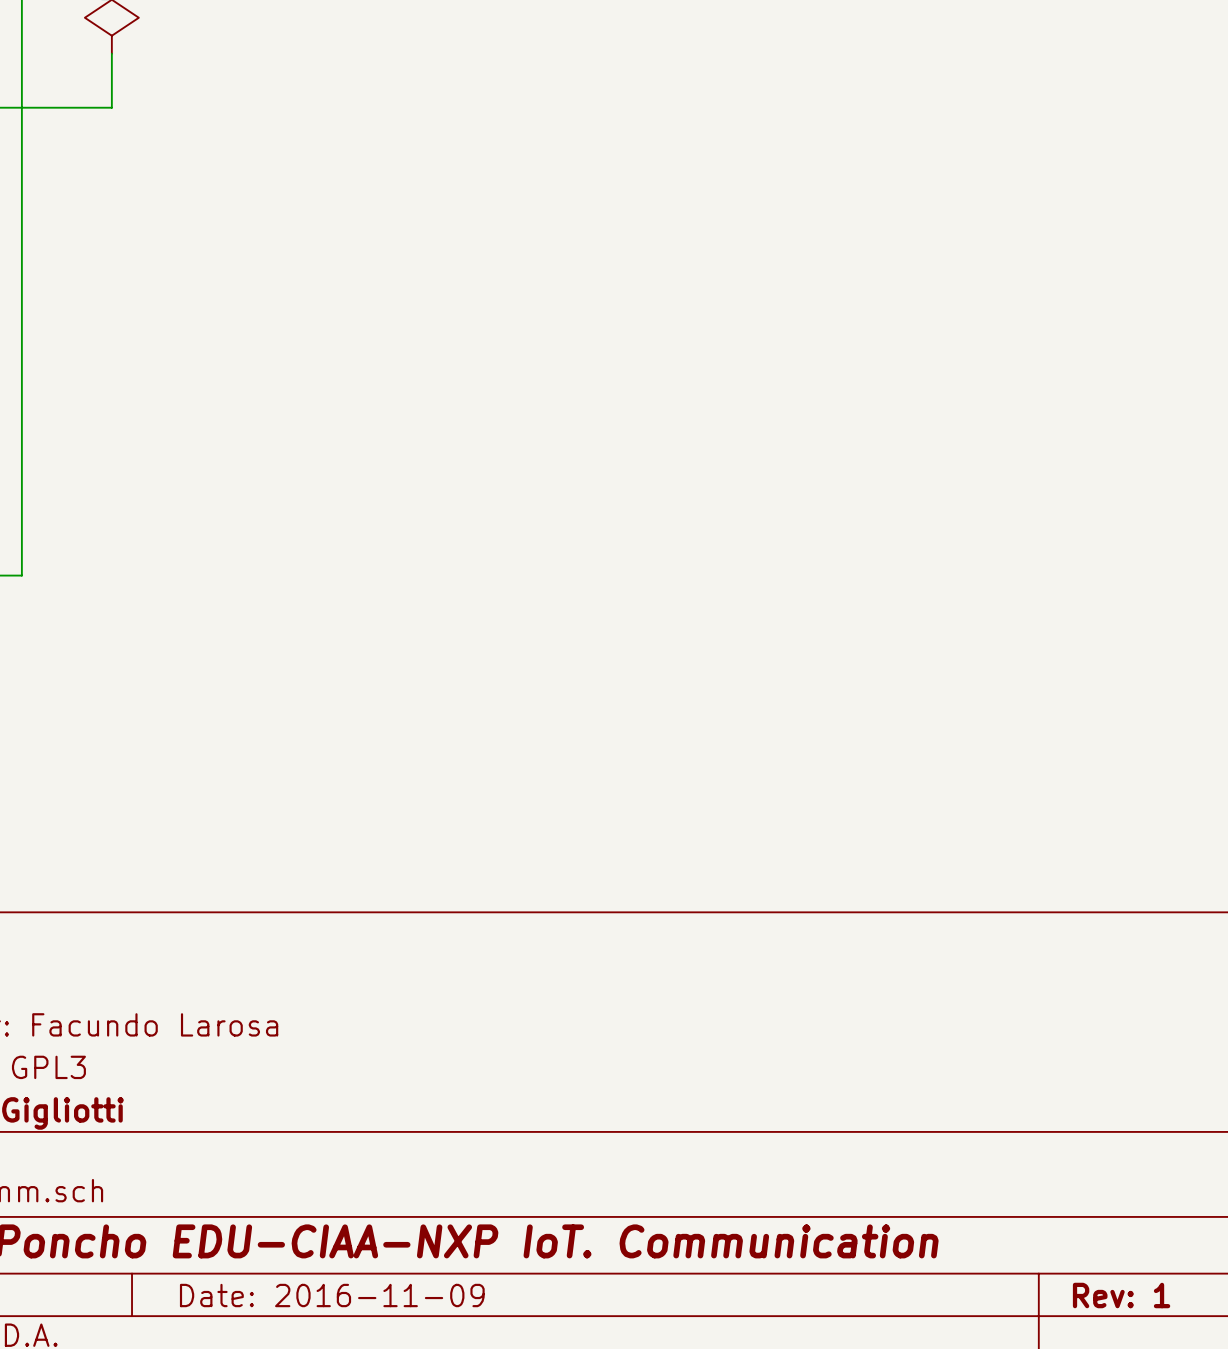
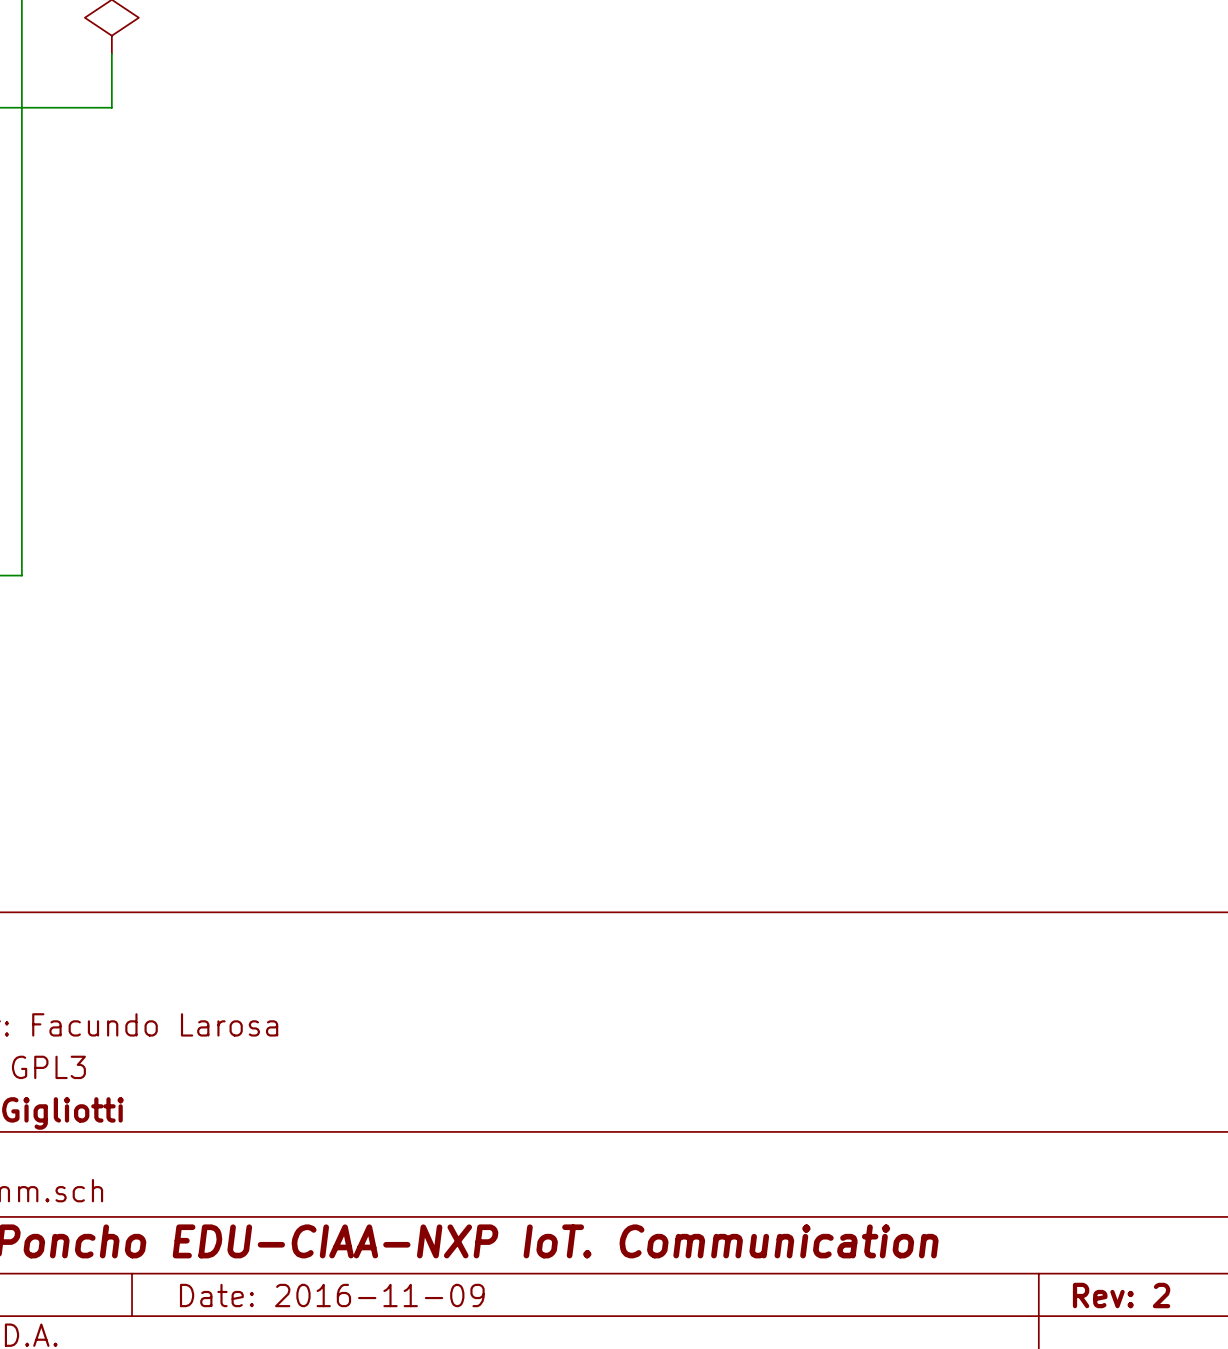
title block: Rev: 1 (1121, 1295) -> Rev: 2 (1121, 1295)

